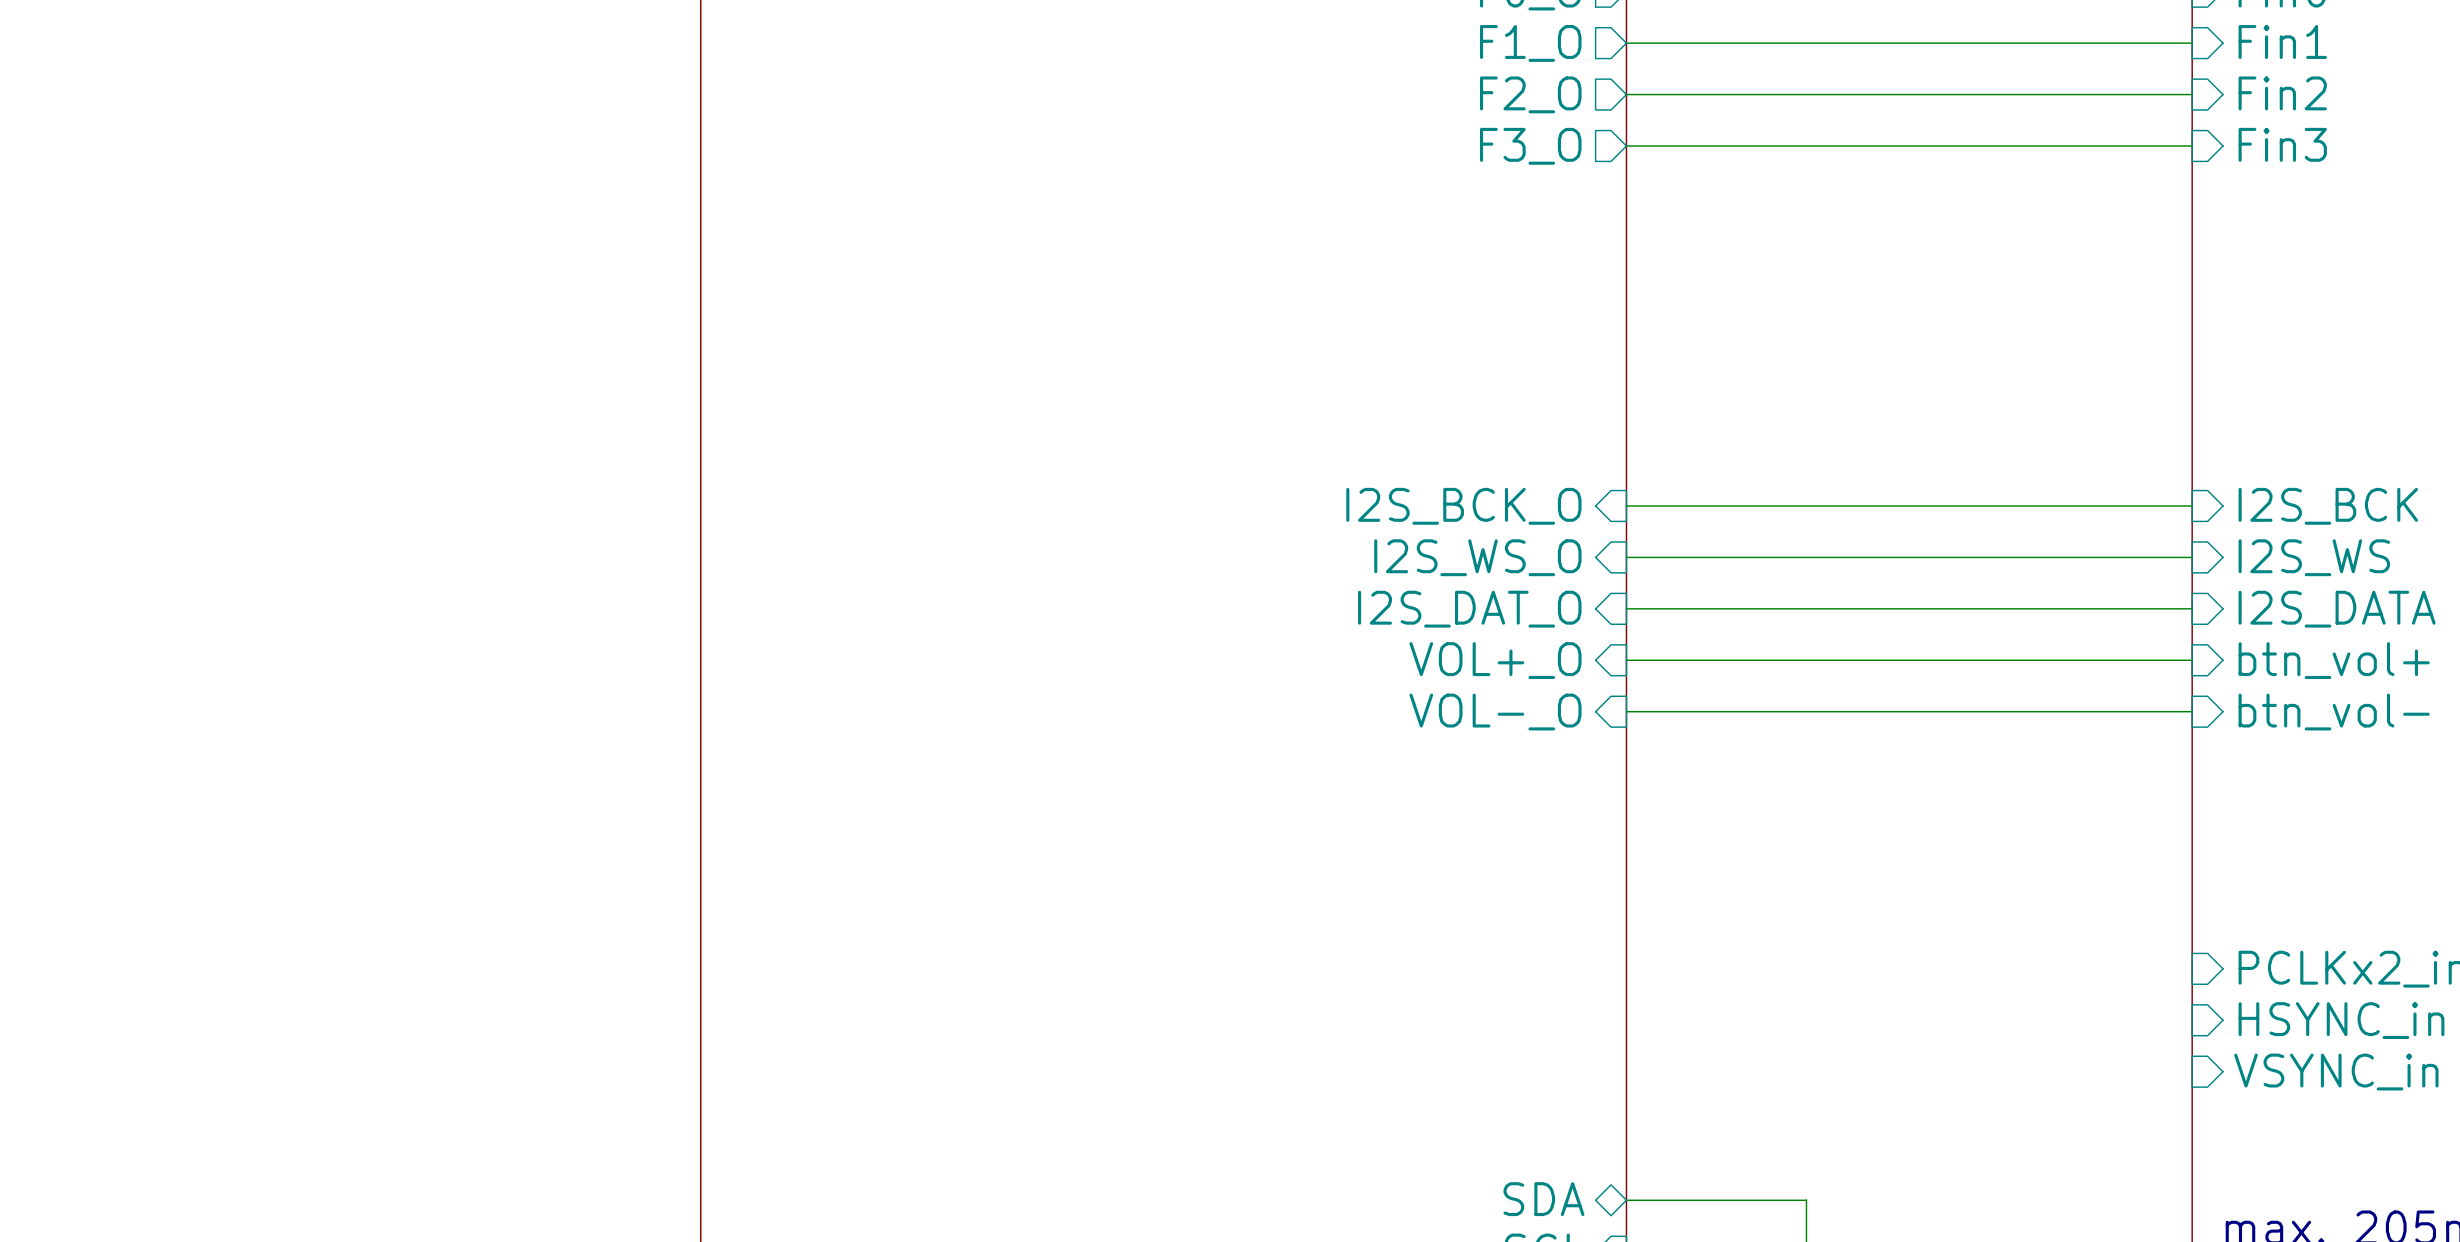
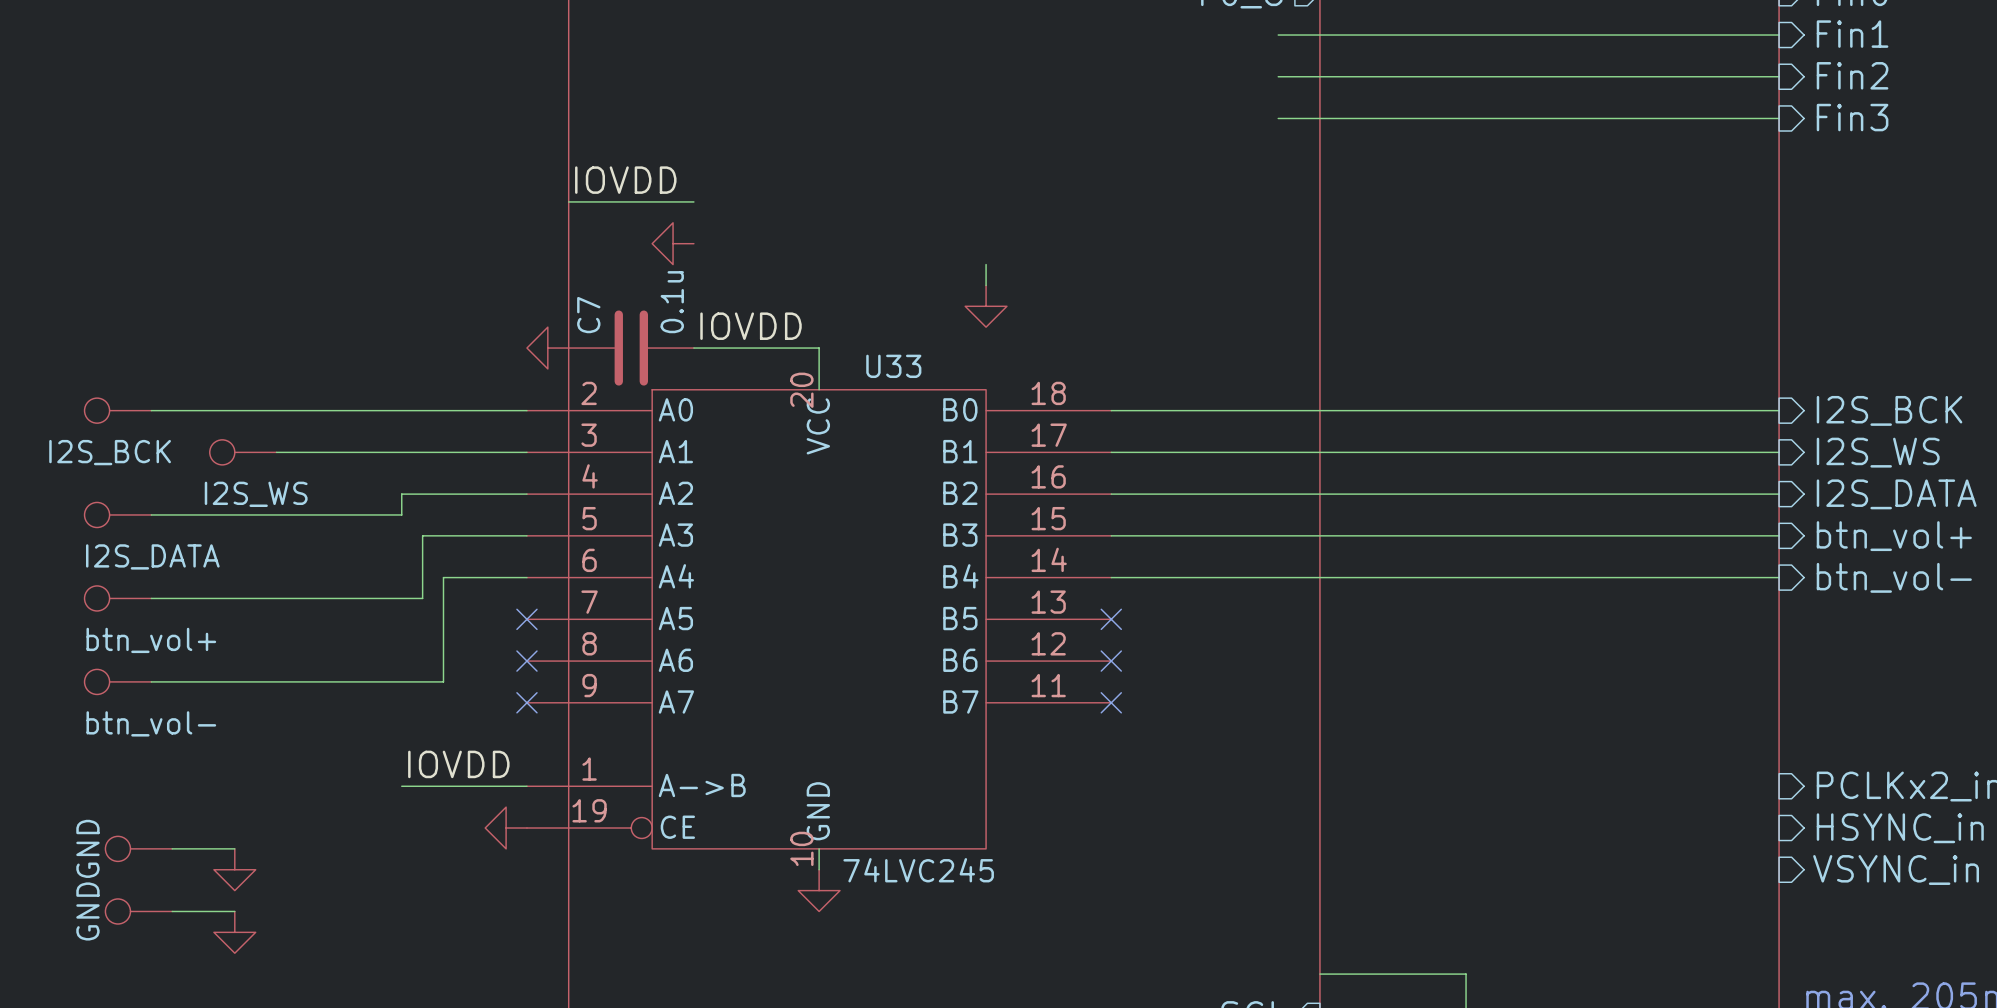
sheet pin: F1_O (1530, 43) -> none
wire: none -> (1278, 35) (1319, 35)
sheet pin: F2_O (1530, 94) -> none
wire: none -> (1278, 76) (1319, 76)
wire: none -> (1278, 118) (1319, 118)
sheet pin: F3_O (1530, 146) -> none
label: none -> IOVDD (625, 180)
wire: none -> (568, 201) (693, 201)
power symbol: none -> (673, 243)
wire: none -> (986, 264) (986, 285)
power symbol: none -> (986, 306)
label: none -> IOVDD (751, 326)
power symbol: none -> (547, 348)
C7: none -> 0.1u (631, 348)
wire: none -> (693, 348) (819, 348) (819, 389)
part: none -> I2S_BCK (117, 410)
wire: none -> (151, 410) (526, 410)
wire: none -> (1111, 410) (1319, 410)
sheet pin: I2S_BCK_O (1463, 506) -> none
part: none -> I2S_WS (243, 452)
wire: none -> (276, 452) (526, 452)
wire: none -> (1111, 452) (1319, 452)
sheet pin: I2S_WS_O (1477, 557) -> none
wire: none -> (526, 494) (401, 494) (401, 514) (151, 514)
wire: none -> (1111, 494) (1319, 494)
sheet pin: I2S_DAT_O (1469, 609) -> none
part: none -> I2S_DATA (117, 514)
wire: none -> (526, 535) (422, 535) (422, 598) (151, 598)
wire: none -> (1111, 535) (1319, 535)
sheet pin: VOL+_O (1495, 660) -> none
wire: none -> (526, 577) (443, 577) (443, 681) (151, 681)
wire: none -> (1111, 577) (1319, 577)
sheet pin: VOL-_O (1495, 712) -> none
part: none -> btn_vol+ (117, 598)
no-connect mark: none -> (526, 619)
U33: none -> 74LVC245 (819, 619)
no-connect mark: none -> (1111, 619)
no-connect mark: none -> (526, 661)
no-connect mark: none -> (1111, 661)
part: none -> btn_vol- (117, 681)
no-connect mark: none -> (526, 702)
no-connect mark: none -> (1111, 702)
label: none -> IOVDD (458, 764)
wire: none -> (401, 786) (526, 786)
power symbol: none -> (506, 828)
part: none -> GND (138, 848)
wire: none -> (172, 848) (234, 848)
wire: none -> (819, 848) (819, 869)
power symbol: none -> (234, 869)
power symbol: none -> (819, 890)
part: none -> GND (138, 911)
wire: none -> (172, 911) (234, 911)
power symbol: none -> (234, 932)
sheet pin: SDA (1543, 1199) -> none

